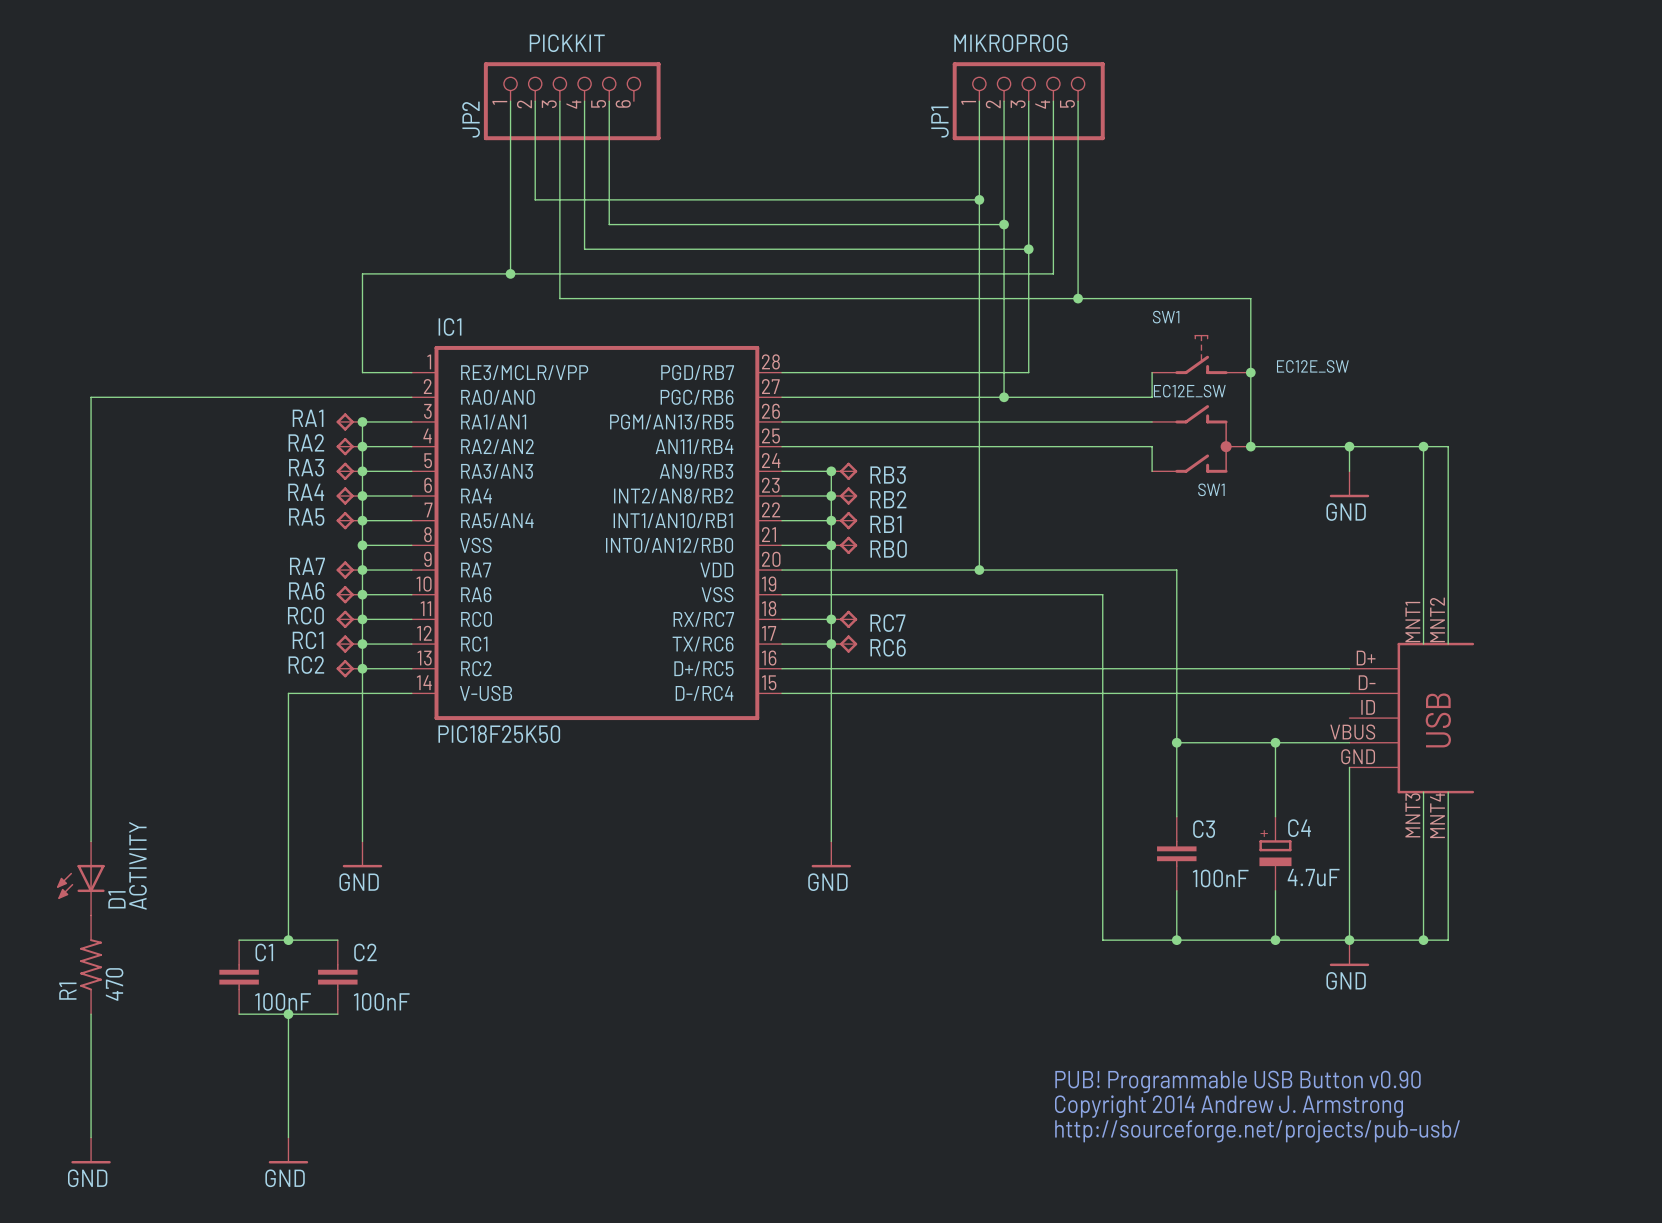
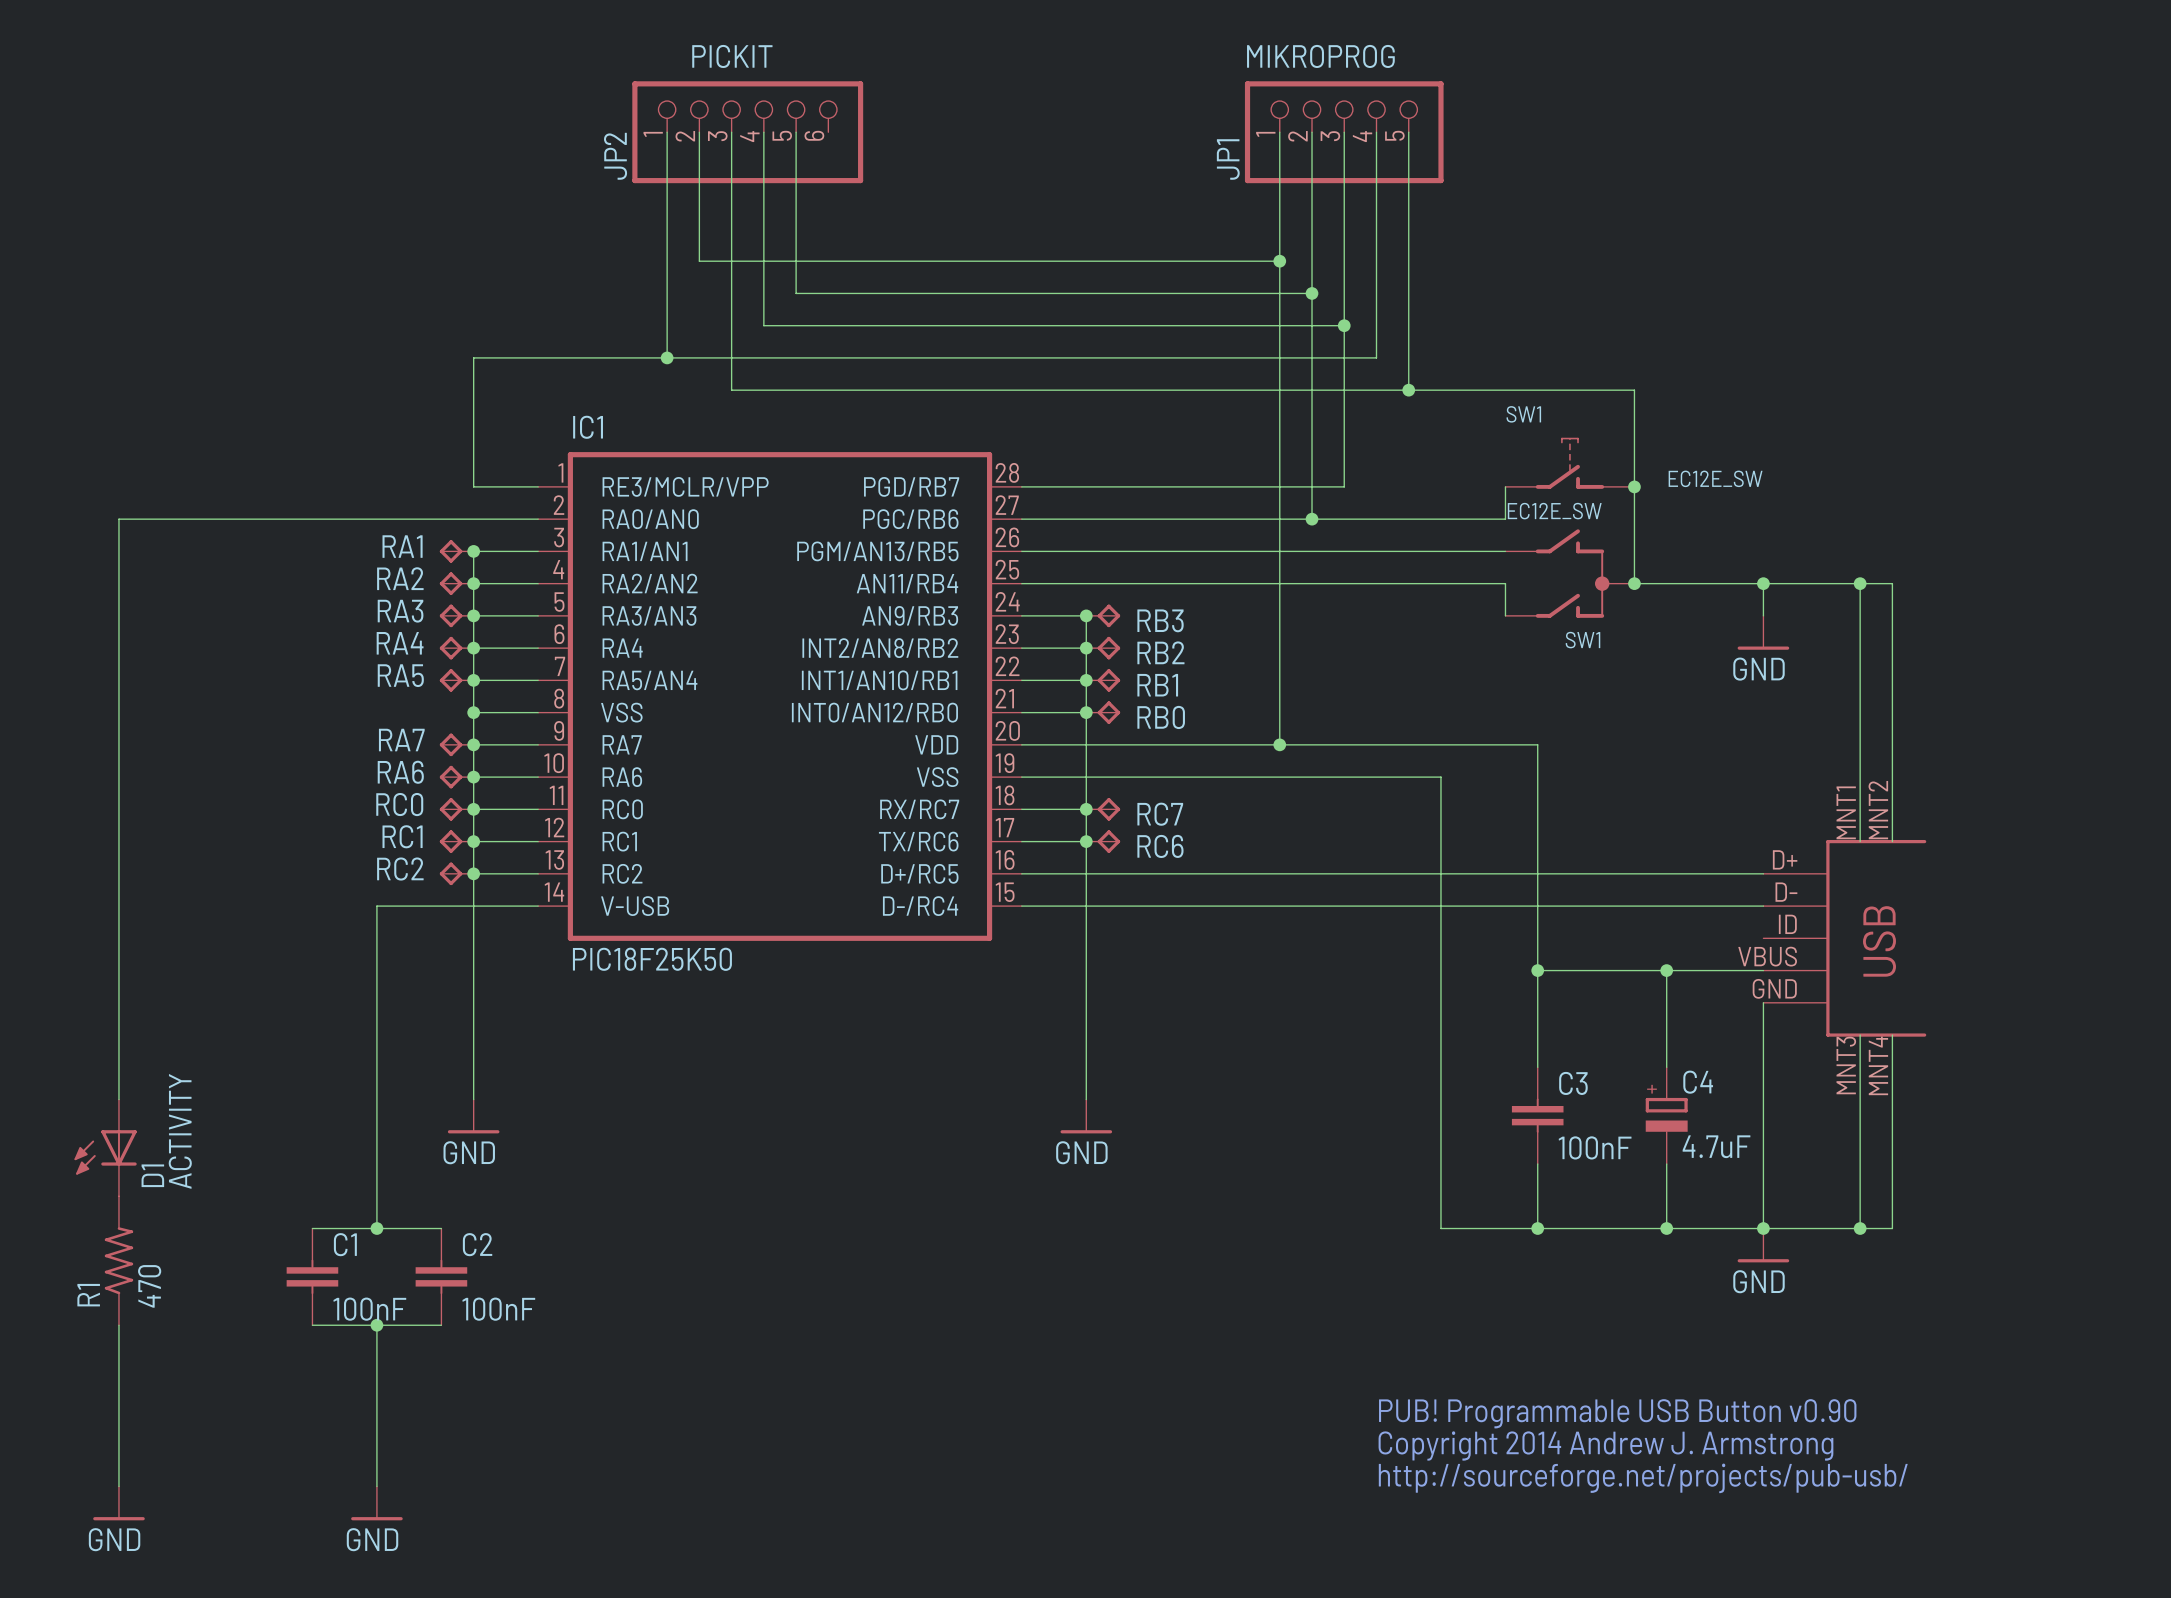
JP2 value: PICKKIT (567, 43) -> PICKIT (732, 56)

